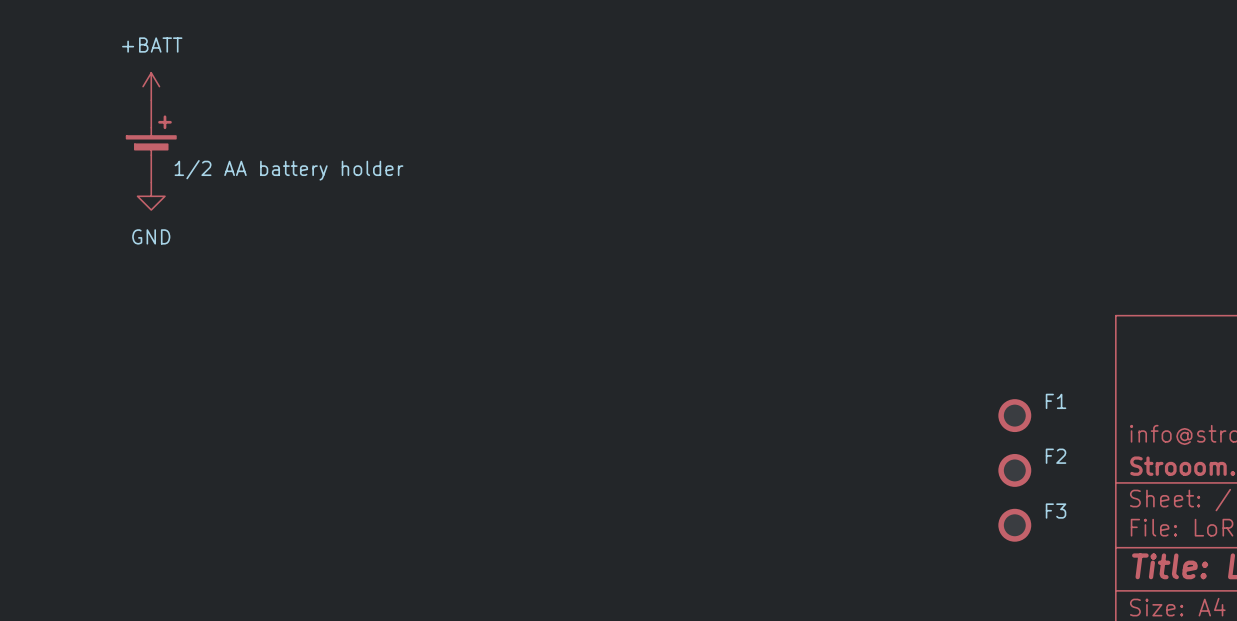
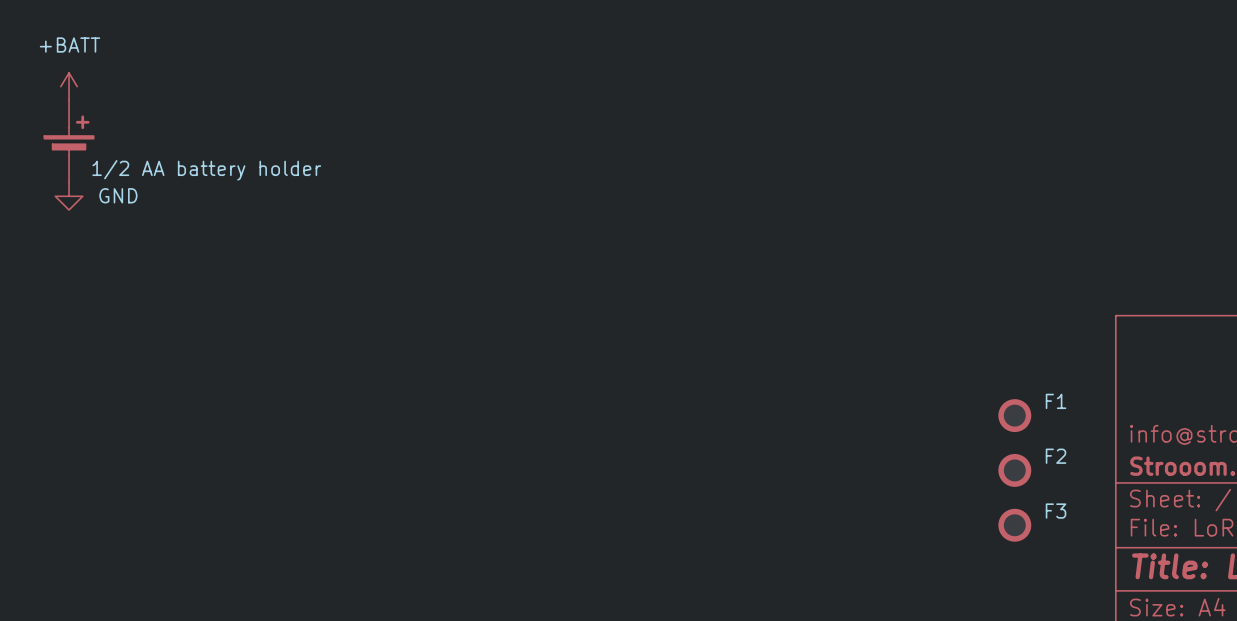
power symbol position: +BATT (151, 86) -> +BATT (69, 86)
part position: (151, 141) -> (69, 141)
power symbol position: GND (151, 196) -> GND (69, 196)
power symbol text position: GND (151, 236) -> GND (118, 195)

